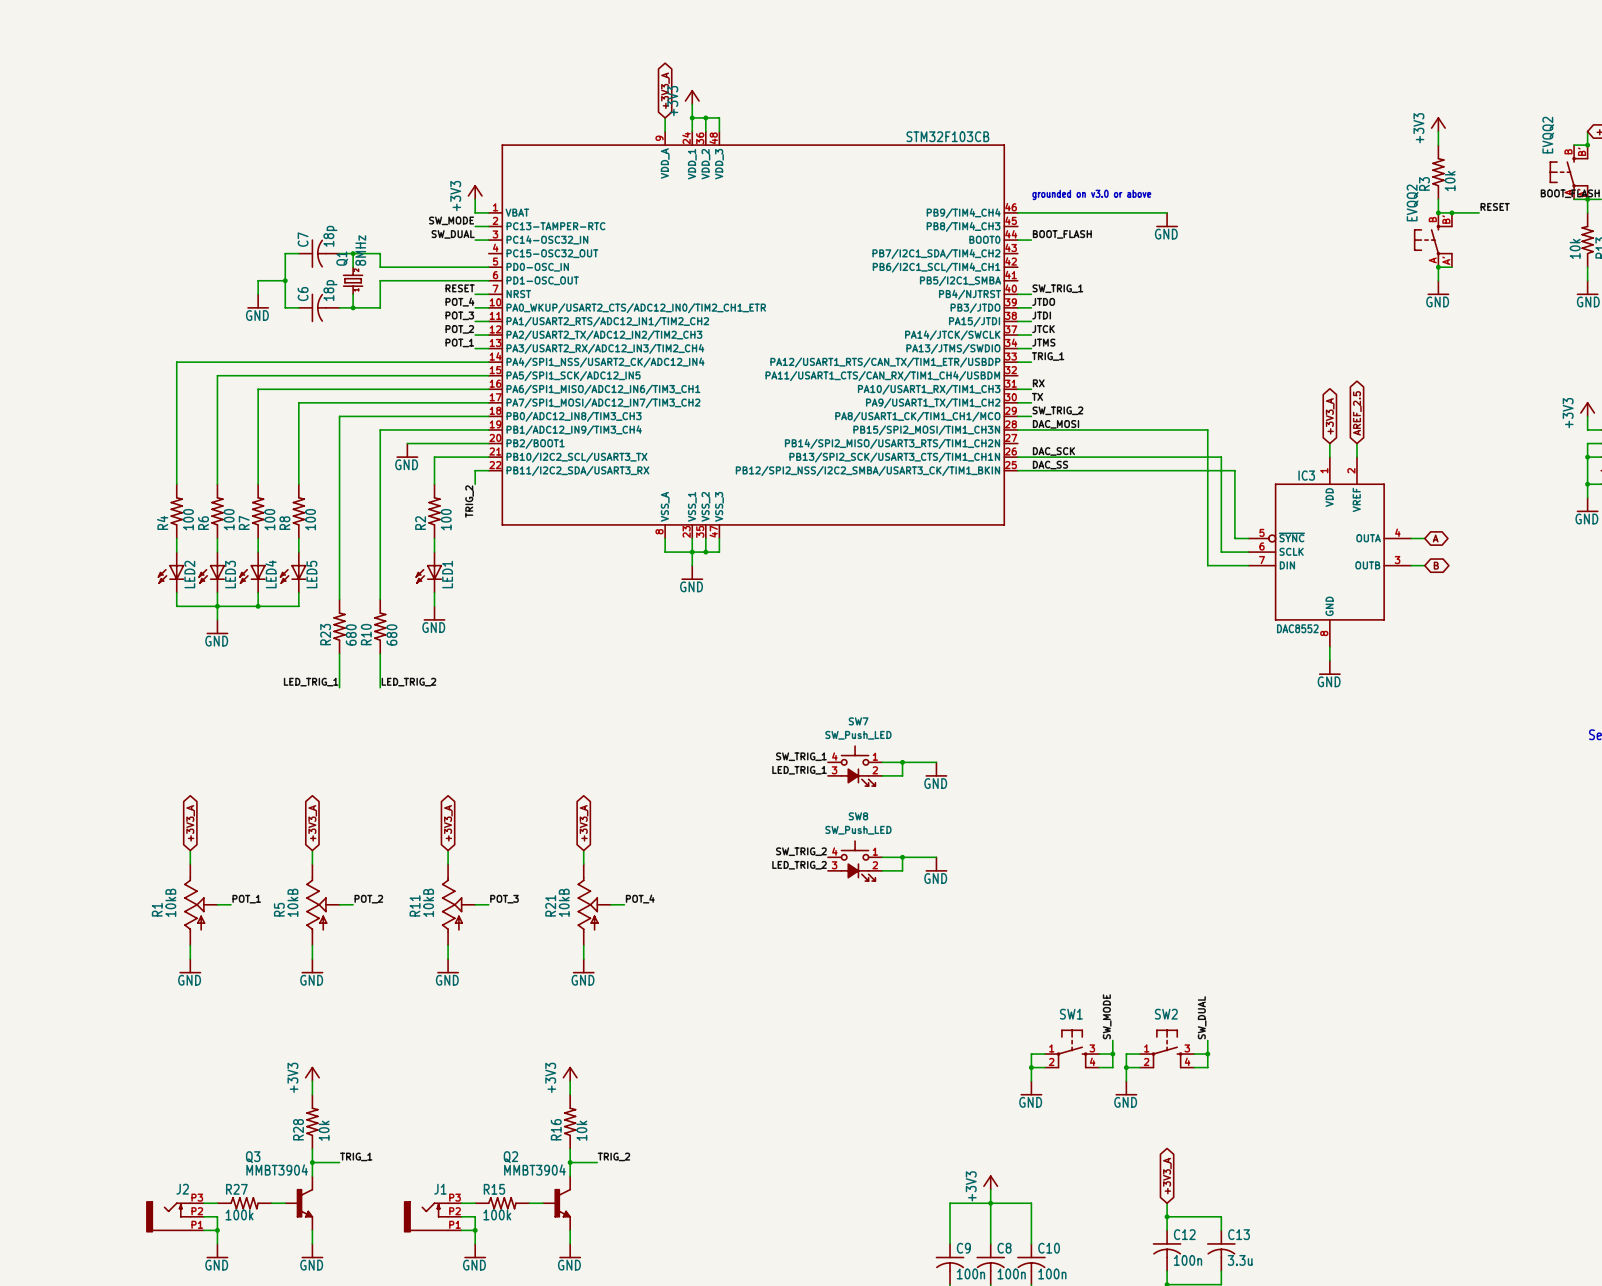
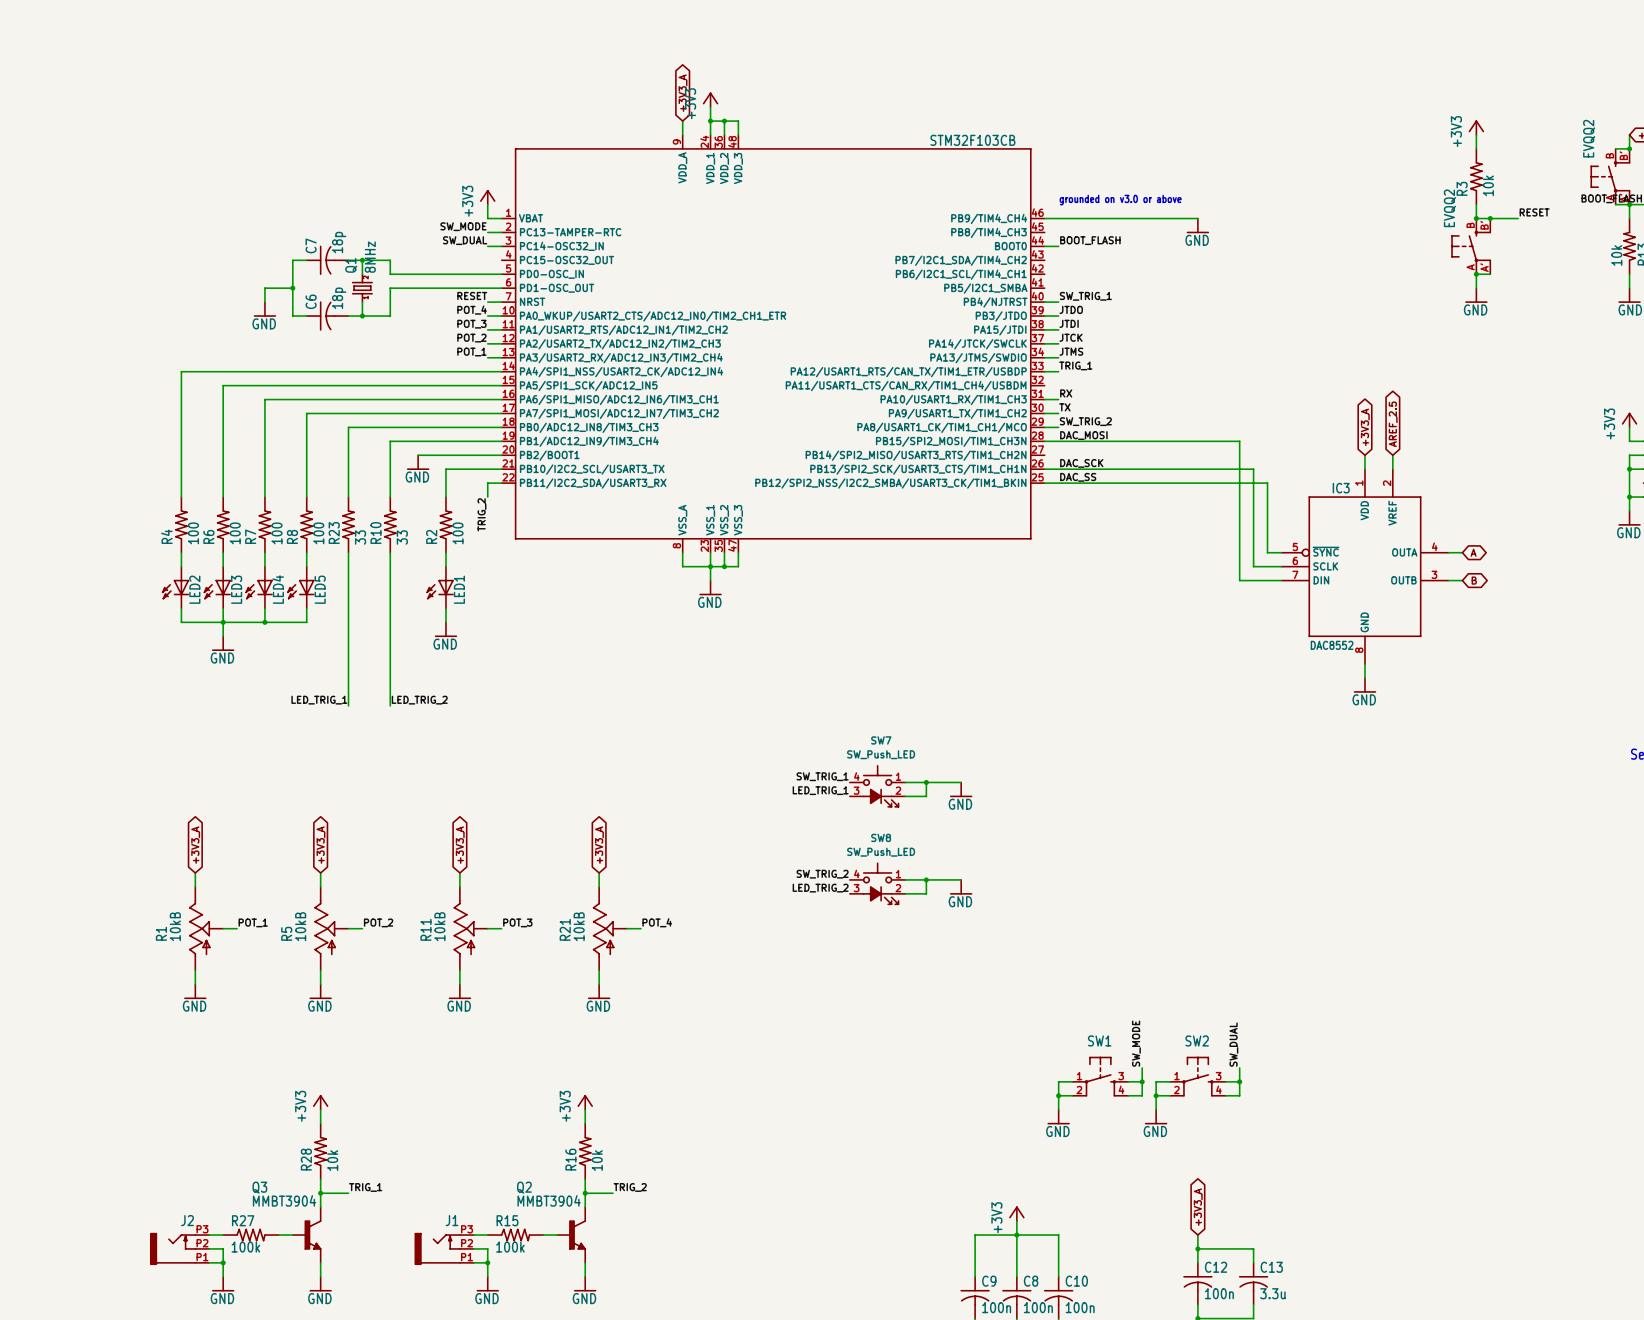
R23 position: (339, 626) -> (348, 524)
R10 position: (380, 626) -> (390, 524)
R23 value: 680 (351, 634) -> 33 (360, 537)
R10 value: 680 (391, 634) -> 33 (402, 537)

